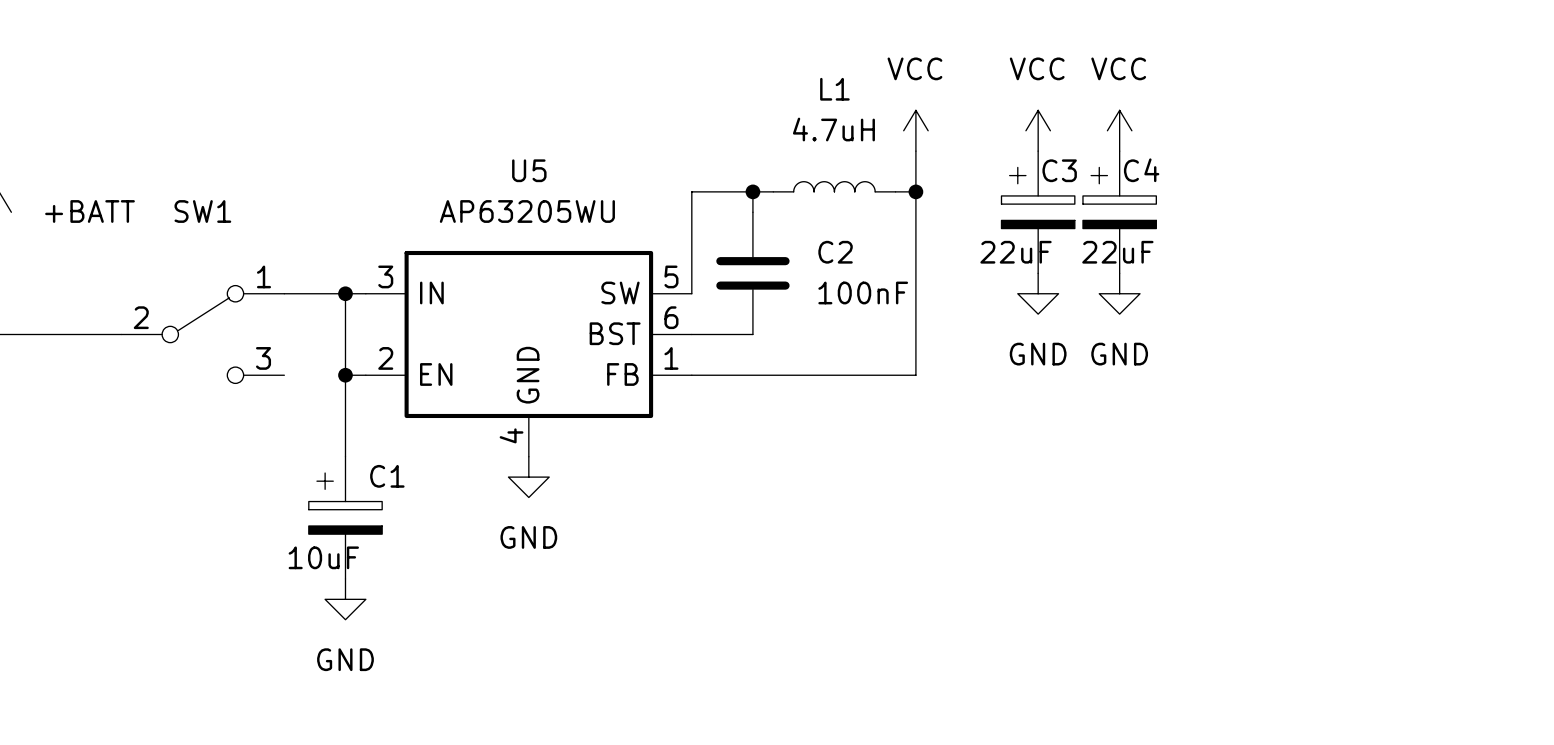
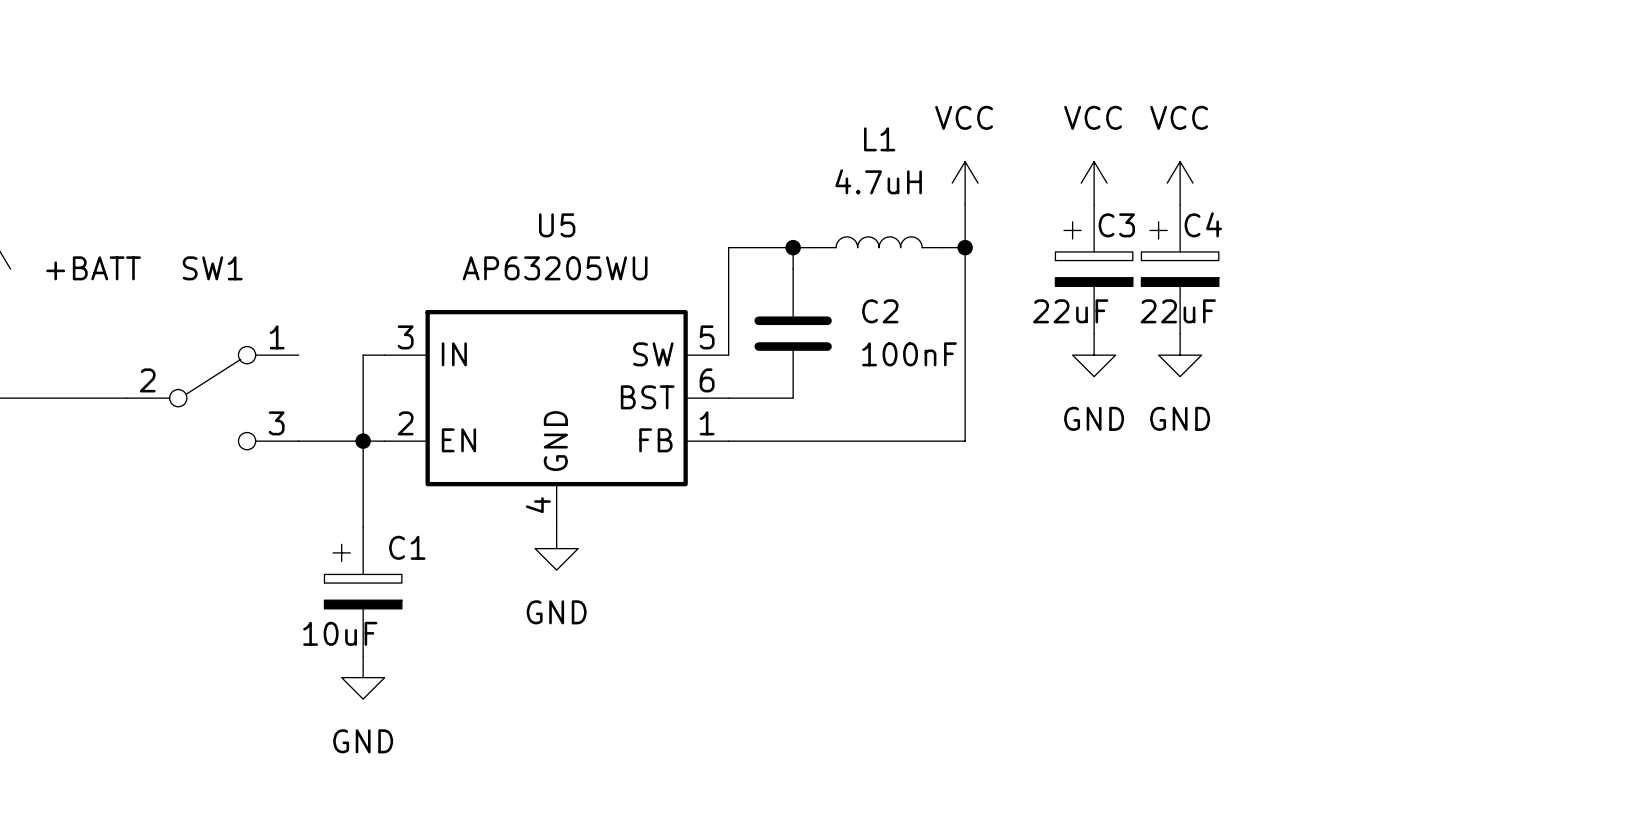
wire: (284, 293) (345, 293) -> (298, 441) (363, 441)
junction: (345, 293) -> none

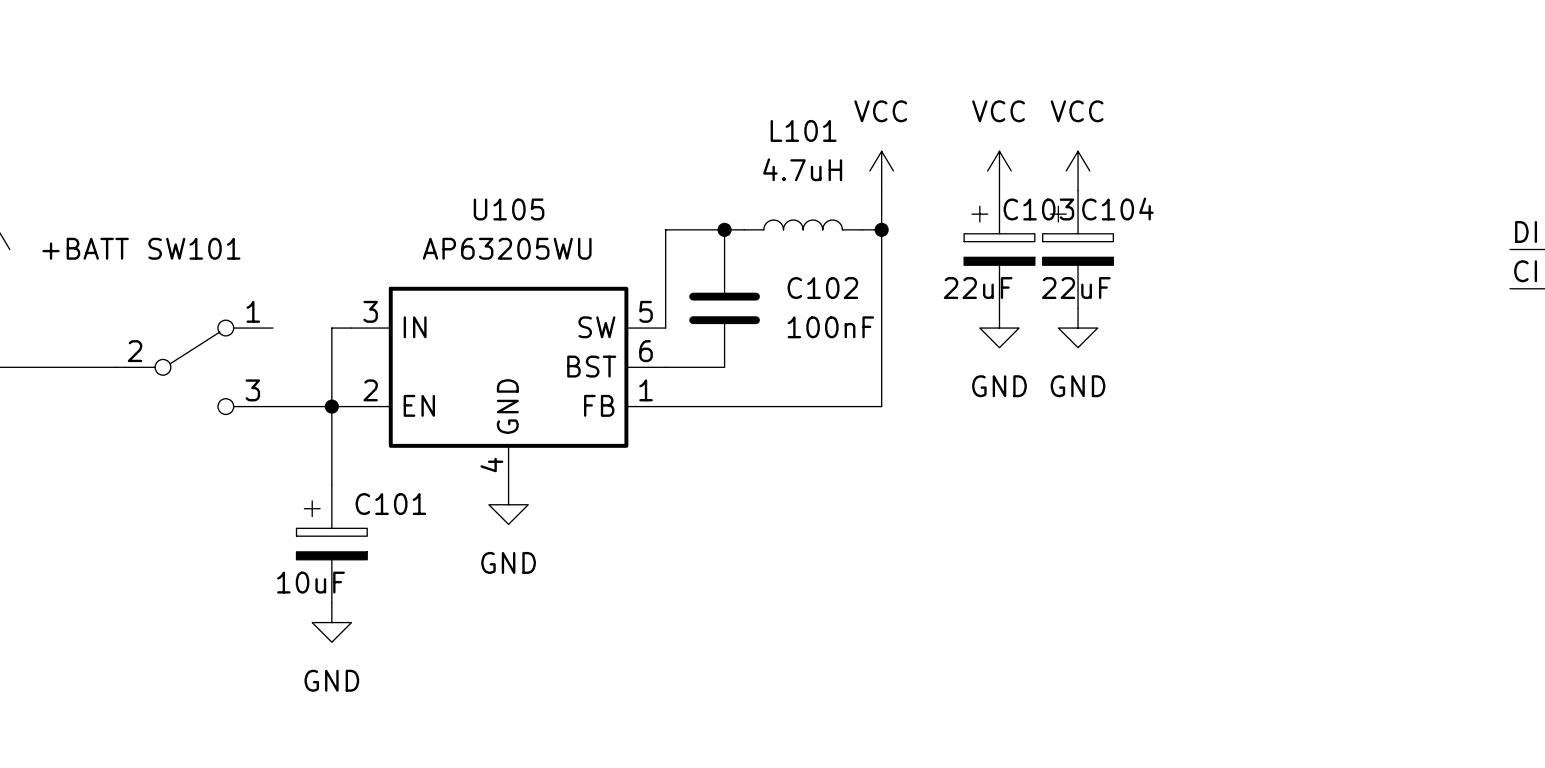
L1 name: L1 (879, 139) -> L101 (803, 130)
C4 name: C4 (1203, 224) -> C104 (1117, 209)
U5 name: U5 (557, 225) -> U105 (509, 209)
C3 name: C3 (1116, 225) -> C103 (1038, 209)
SW1 name: SW1 (212, 268) -> SW101 (194, 248)
C2 name: C2 (880, 311) -> C102 (822, 288)
C1 name: C1 (407, 547) -> C101 (390, 504)

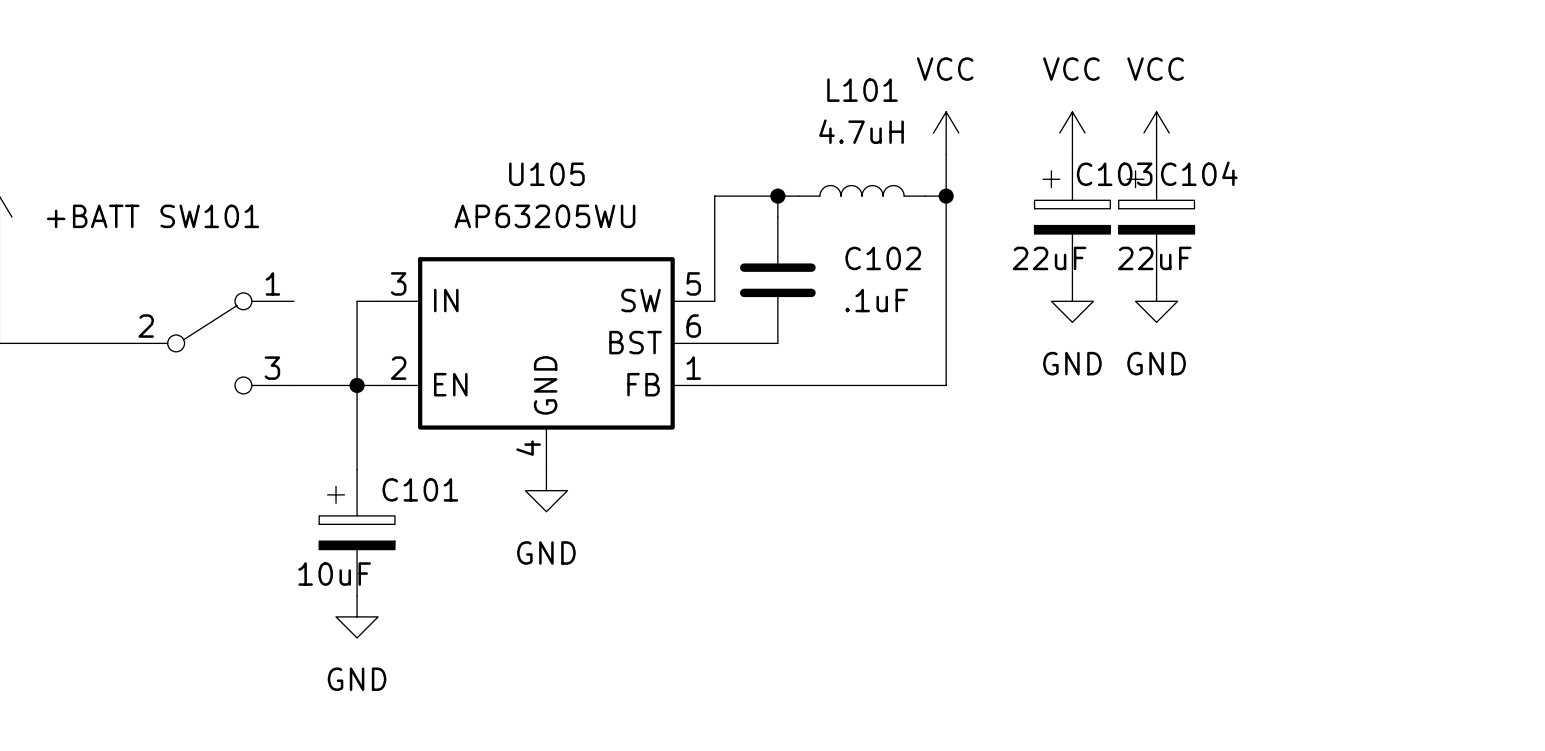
C102 value: 100nF (830, 327) -> .1uF (876, 300)

